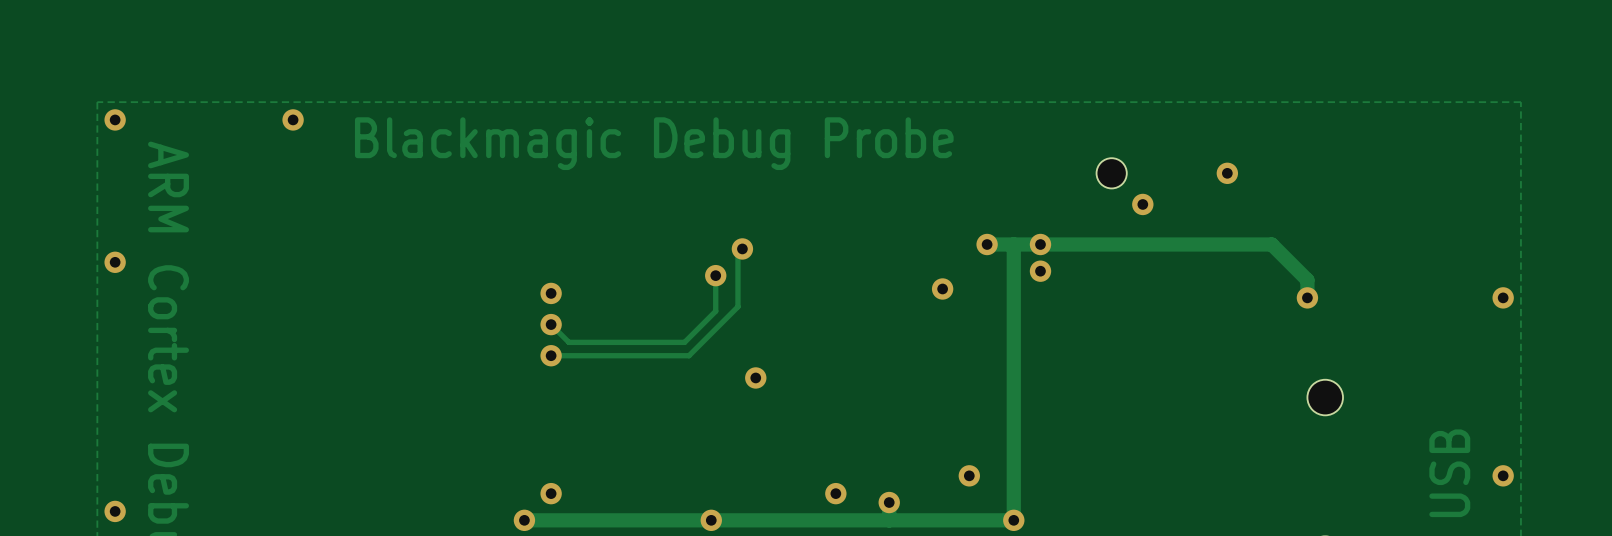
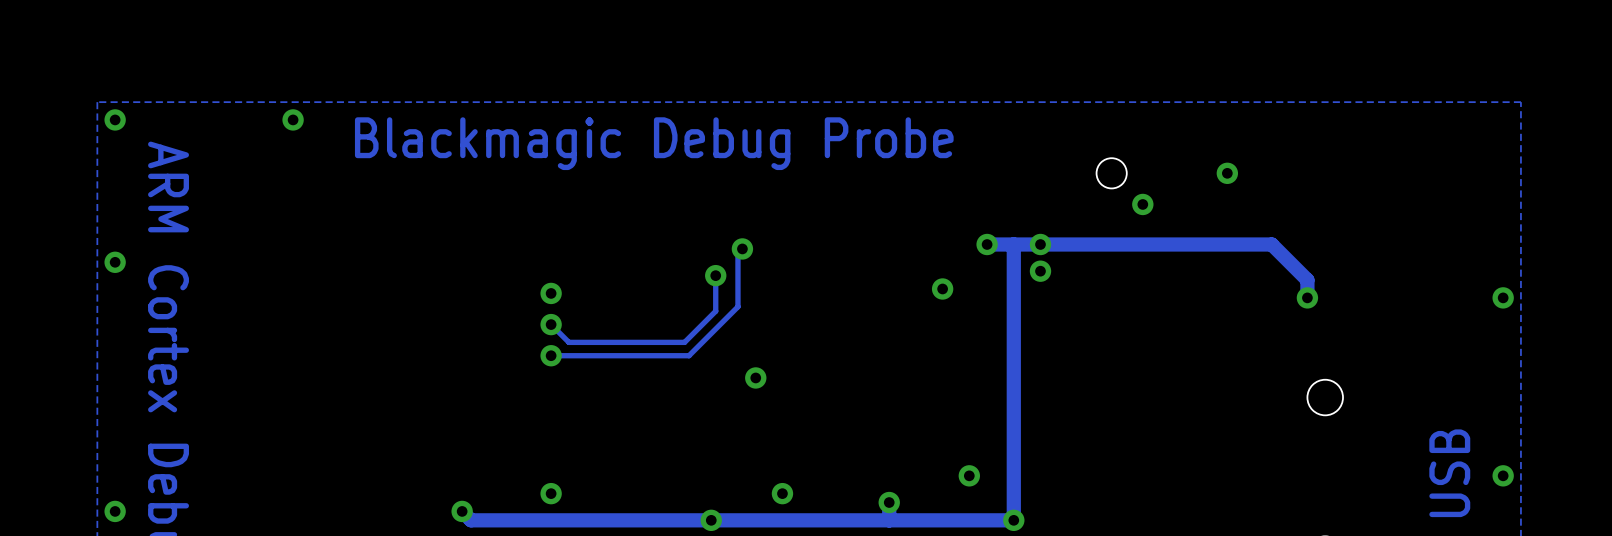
via position: (835, 493) -> (782, 493)
track: none -> (462, 511) (471, 520) (524, 520)
via position: (524, 520) -> (462, 511)

